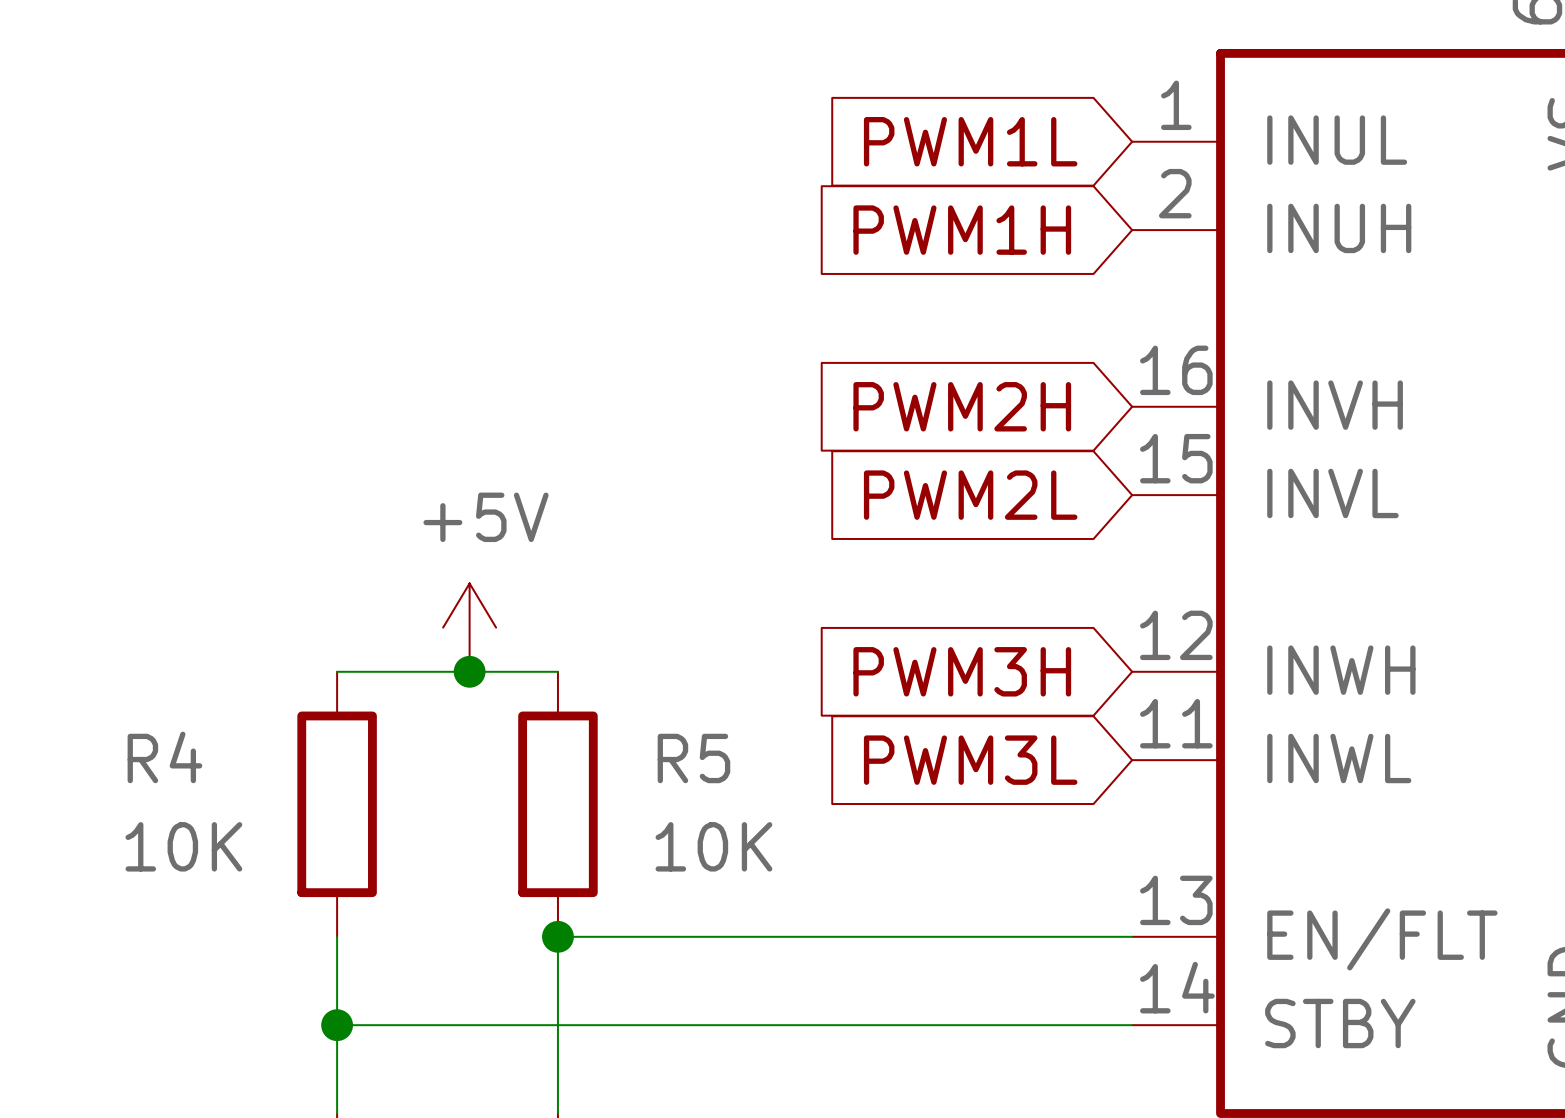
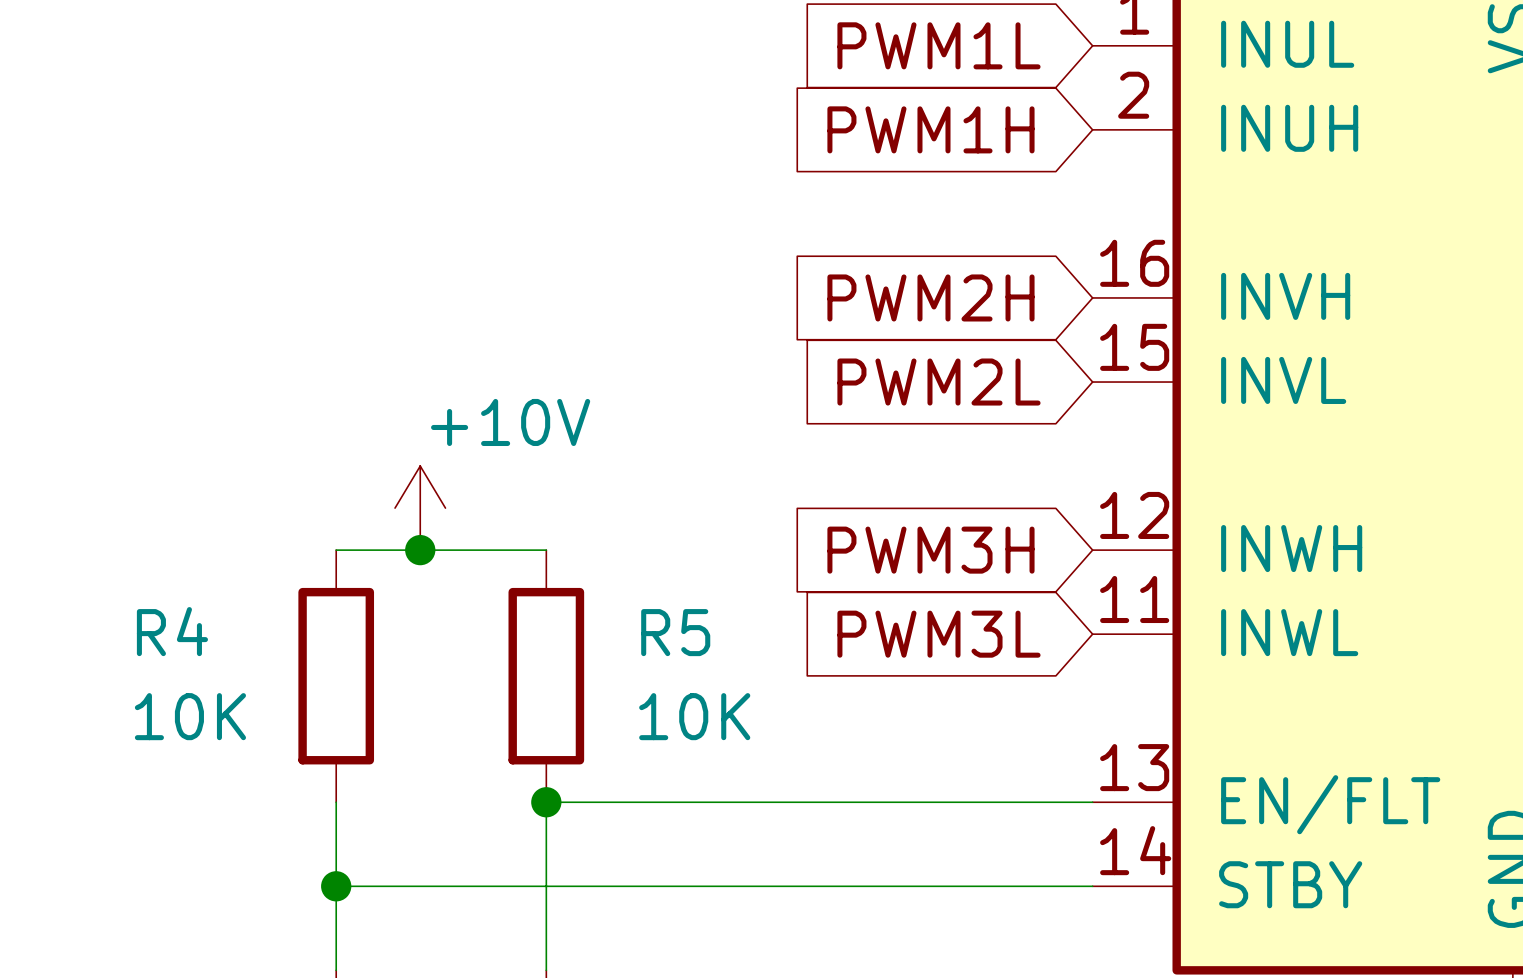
power symbol: none -> +10V (420, 508)
power symbol: +5V (469, 627) -> none
junction position: (469, 671) -> (420, 550)

